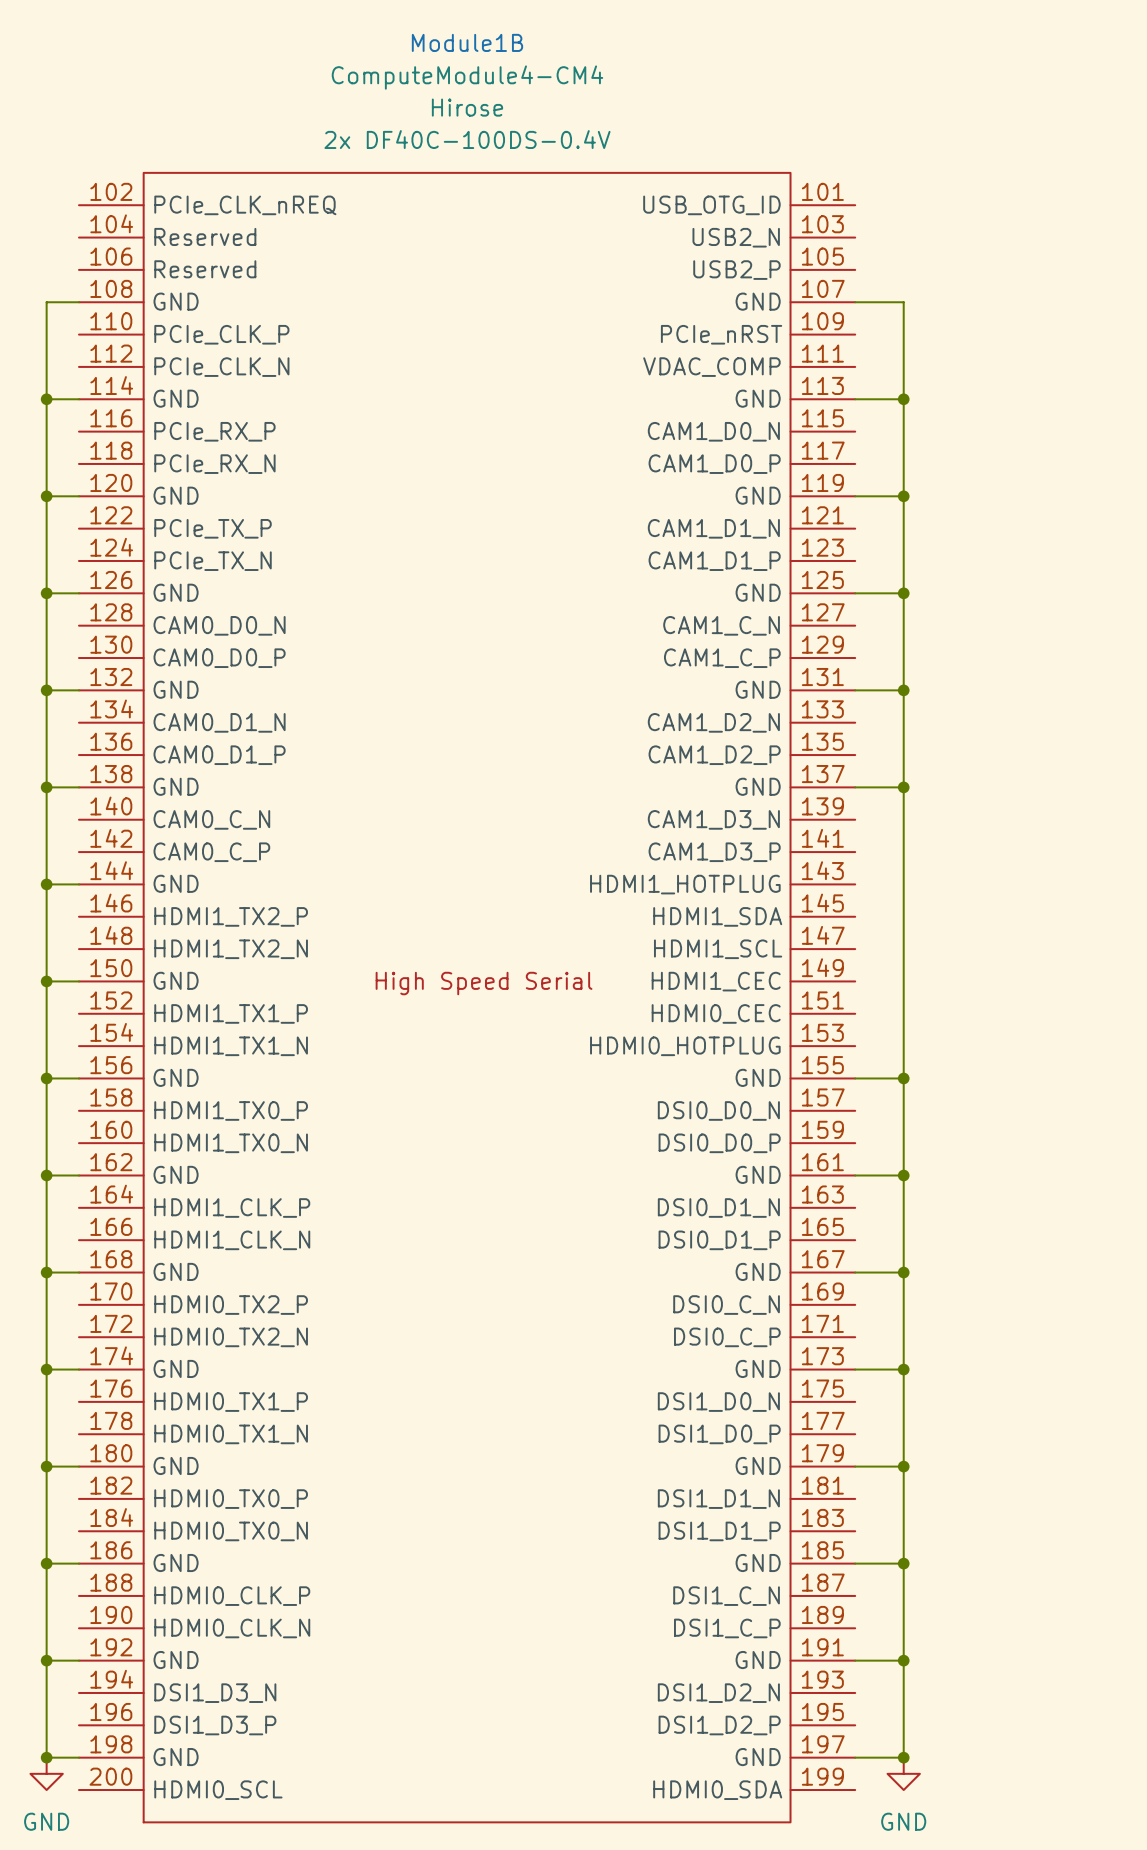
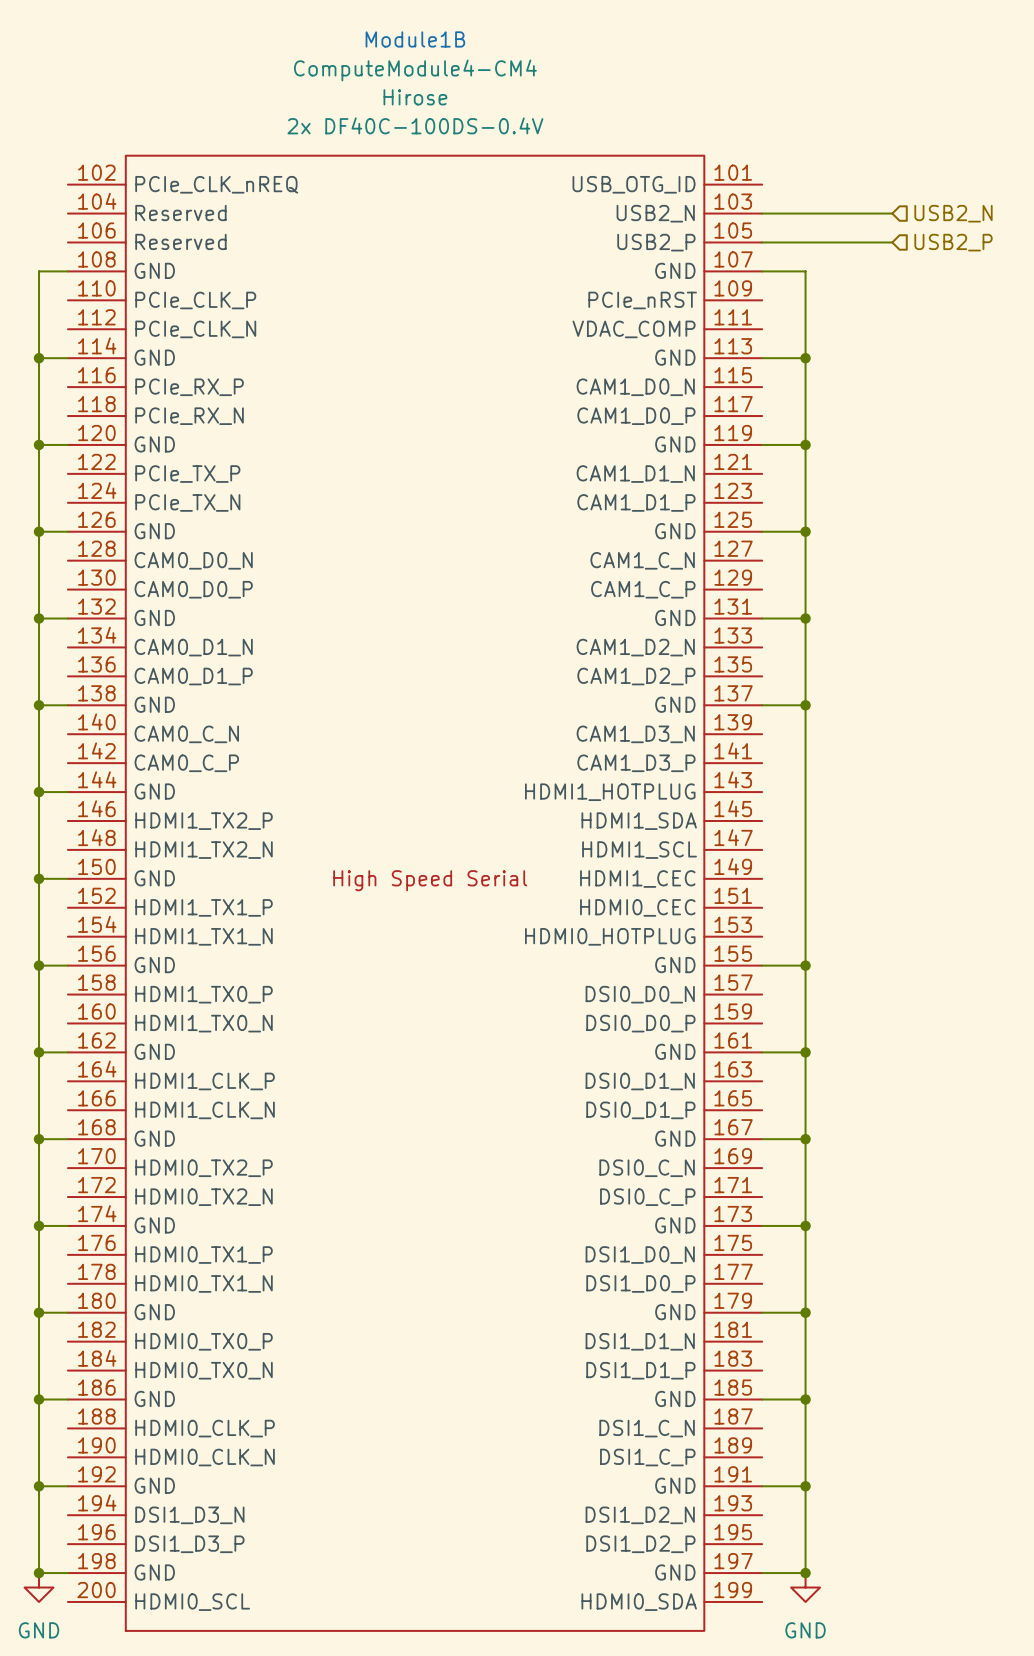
wire: none -> (762, 213) (892, 213)
hierarchical label: none -> USB2_N (953, 213)
wire: none -> (762, 242) (892, 242)
hierarchical label: none -> USB2_P (953, 242)

